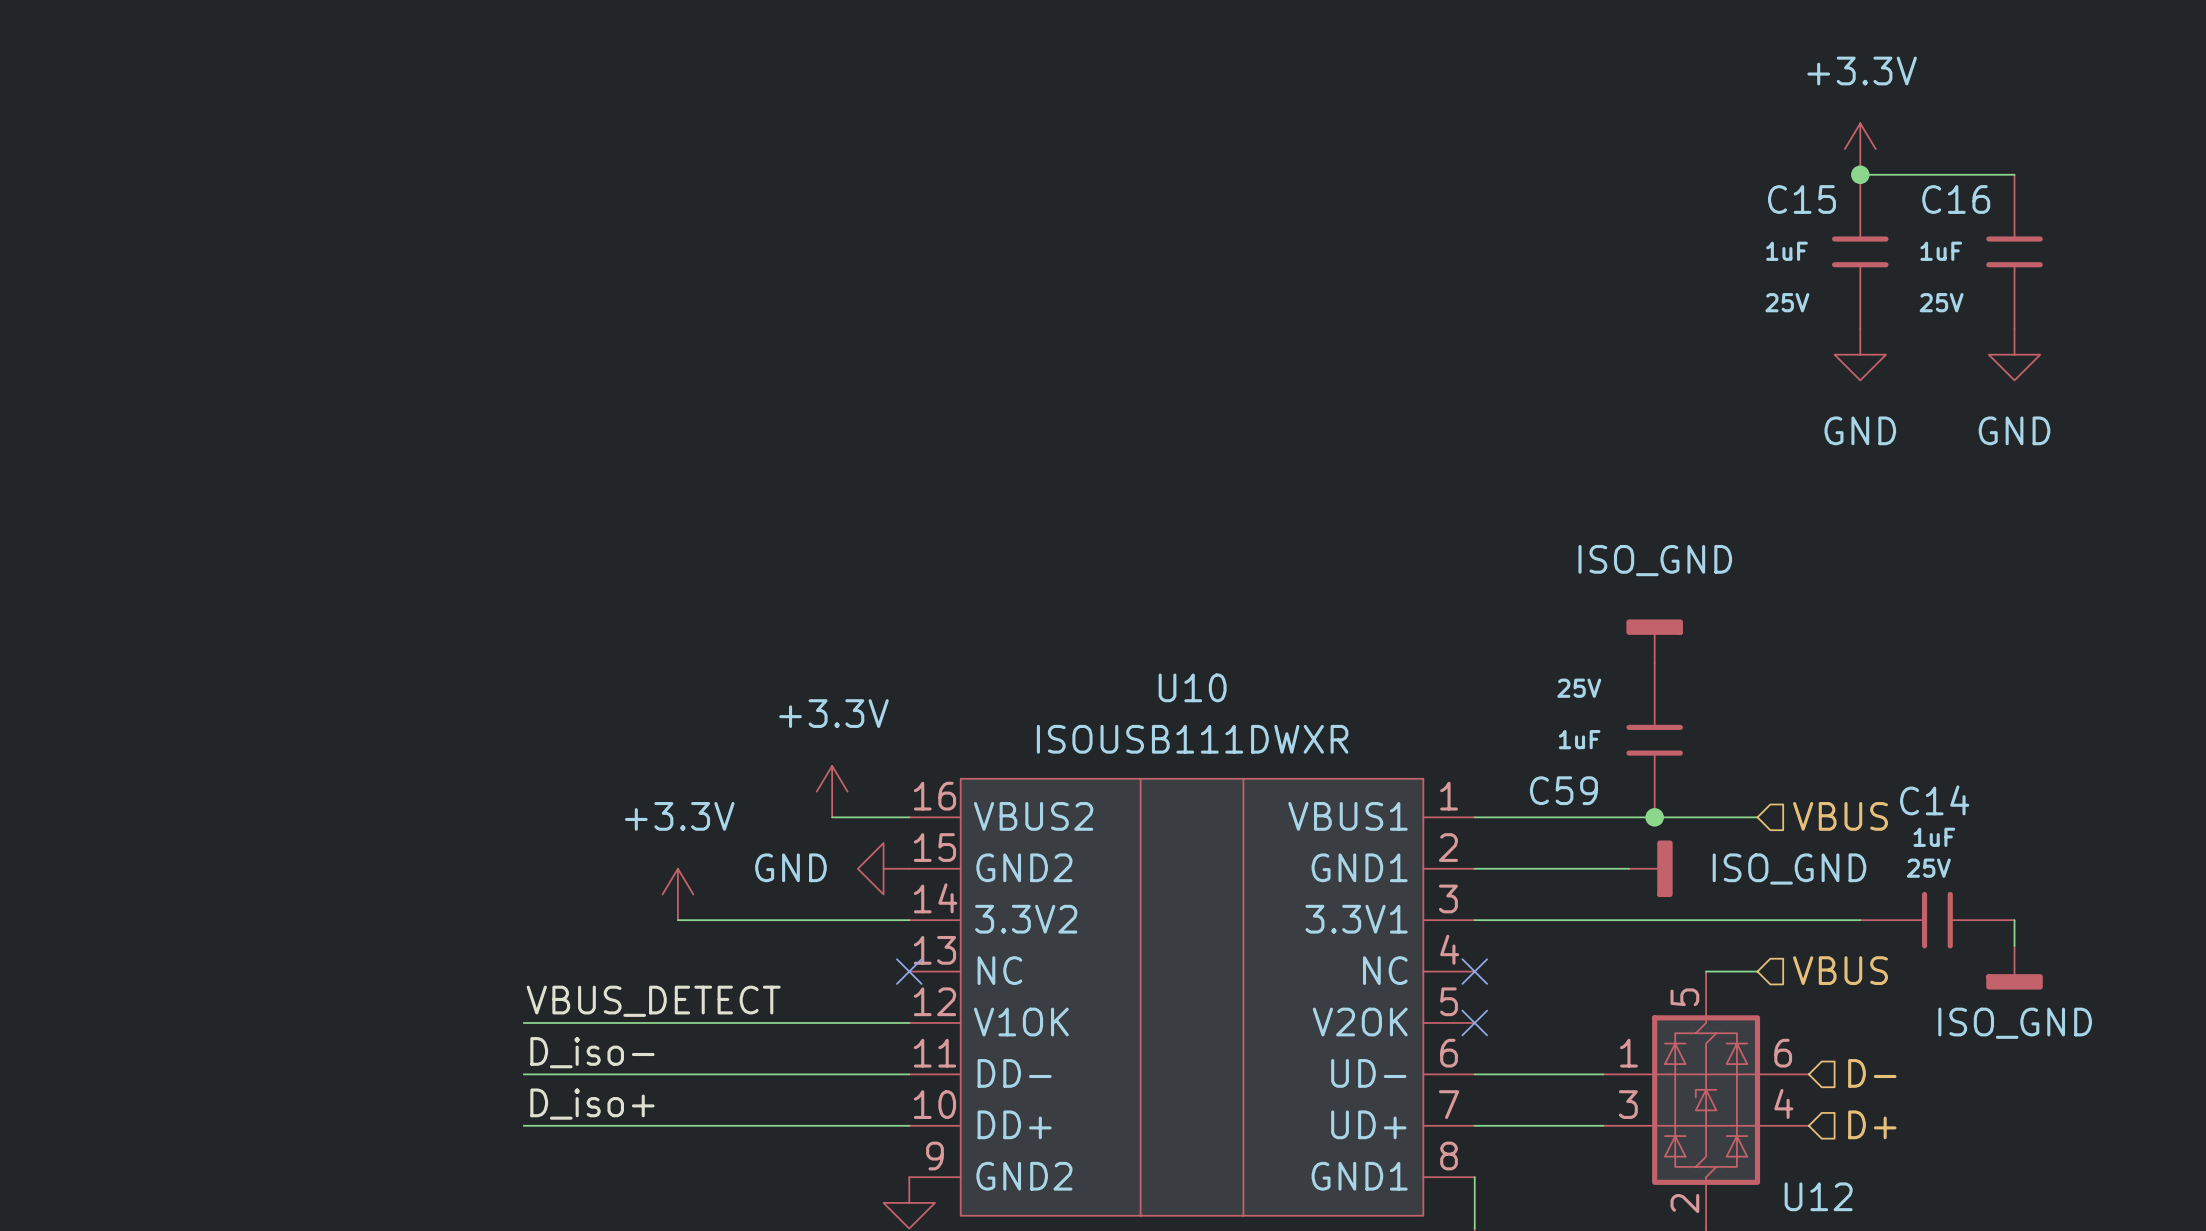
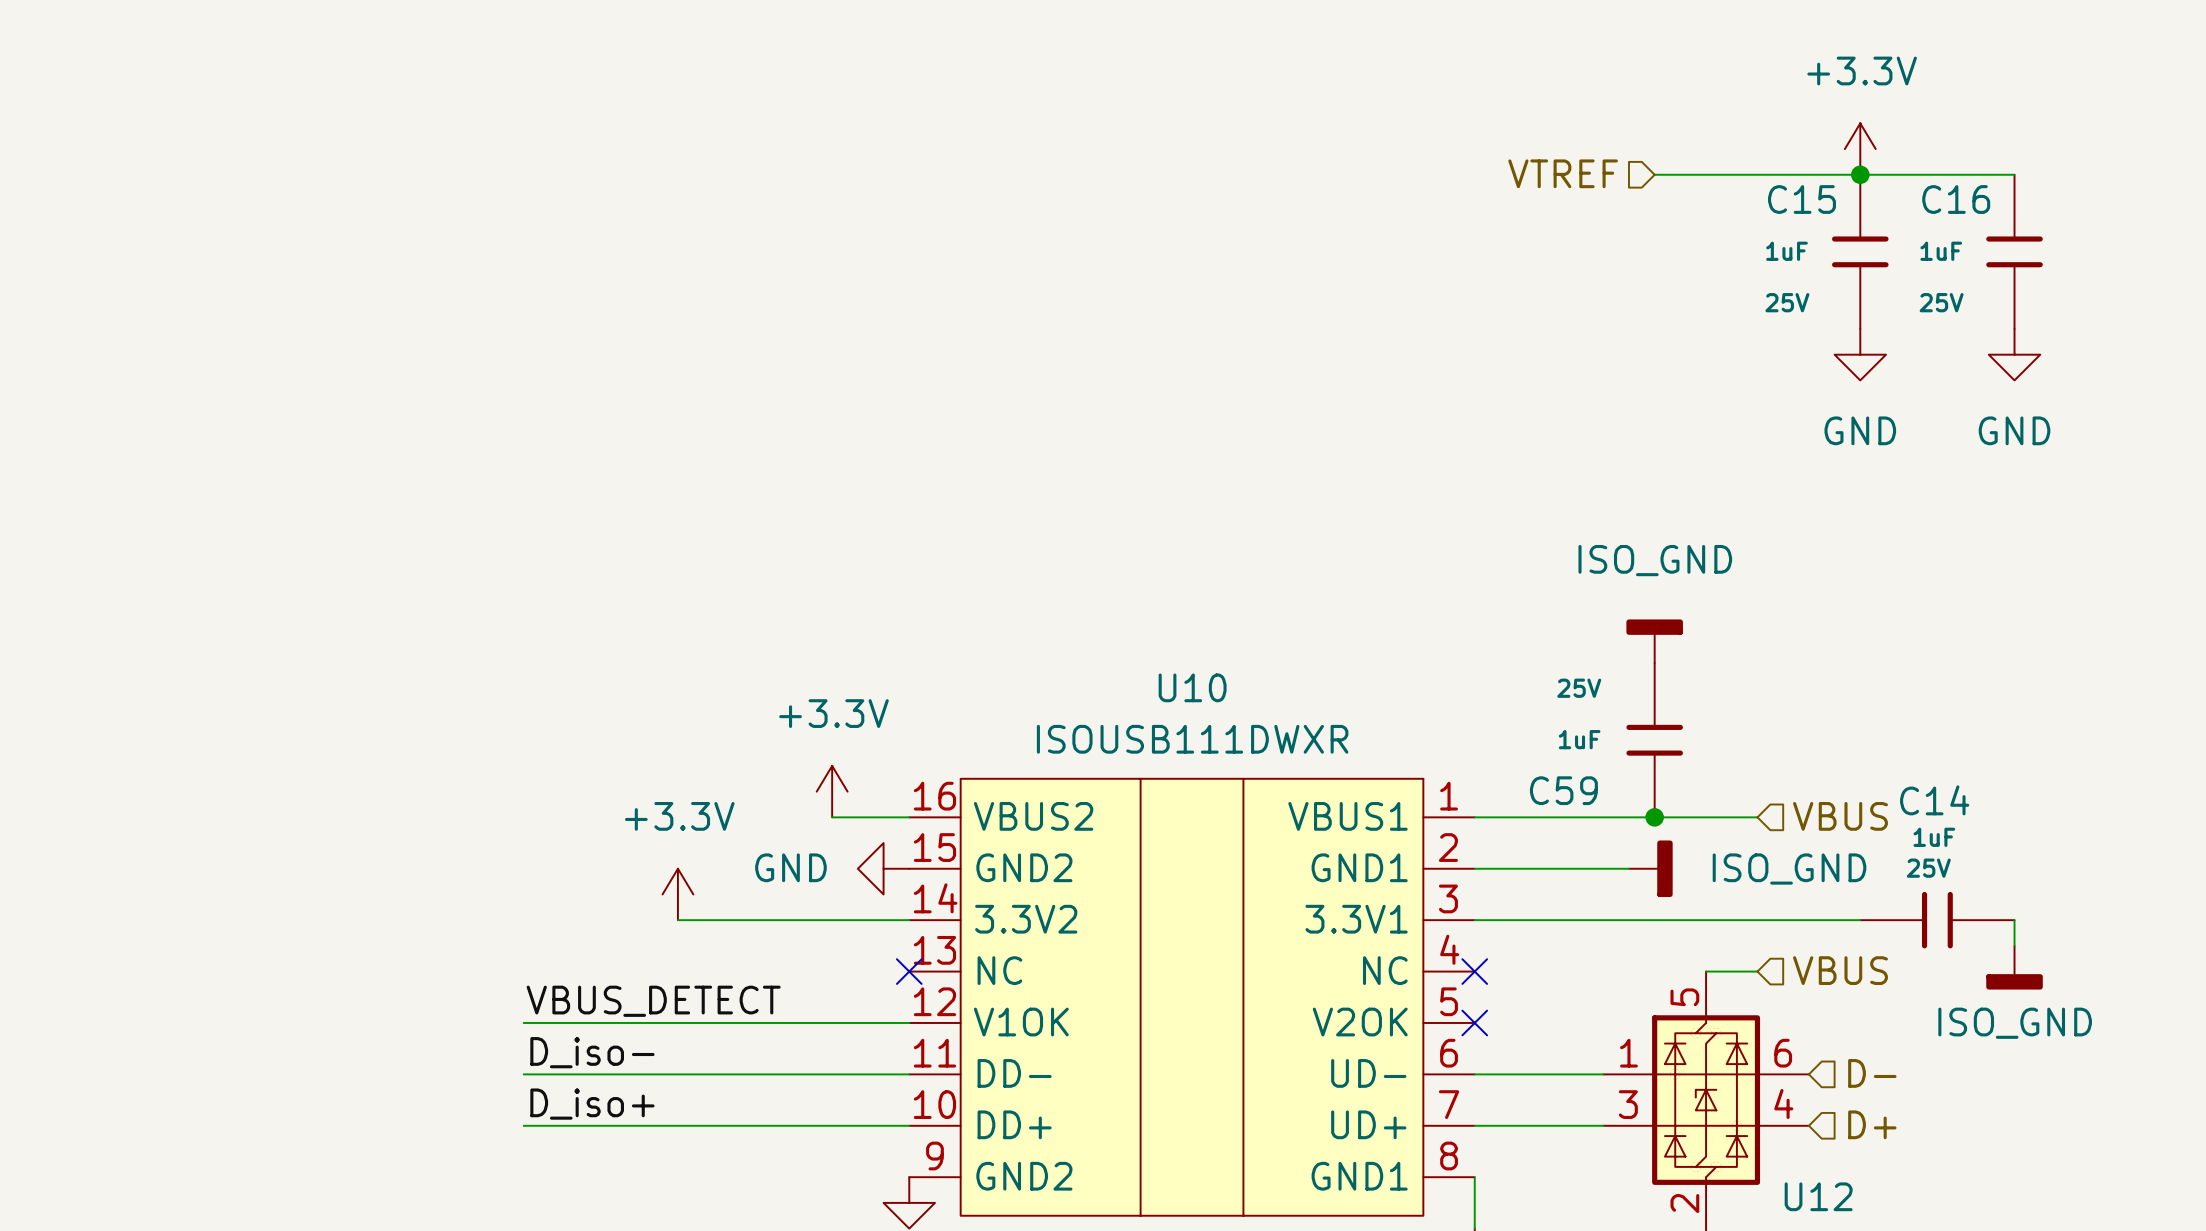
hierarchical label: none -> VTREF (1563, 173)
wire: none -> (1654, 174) (1860, 174)

